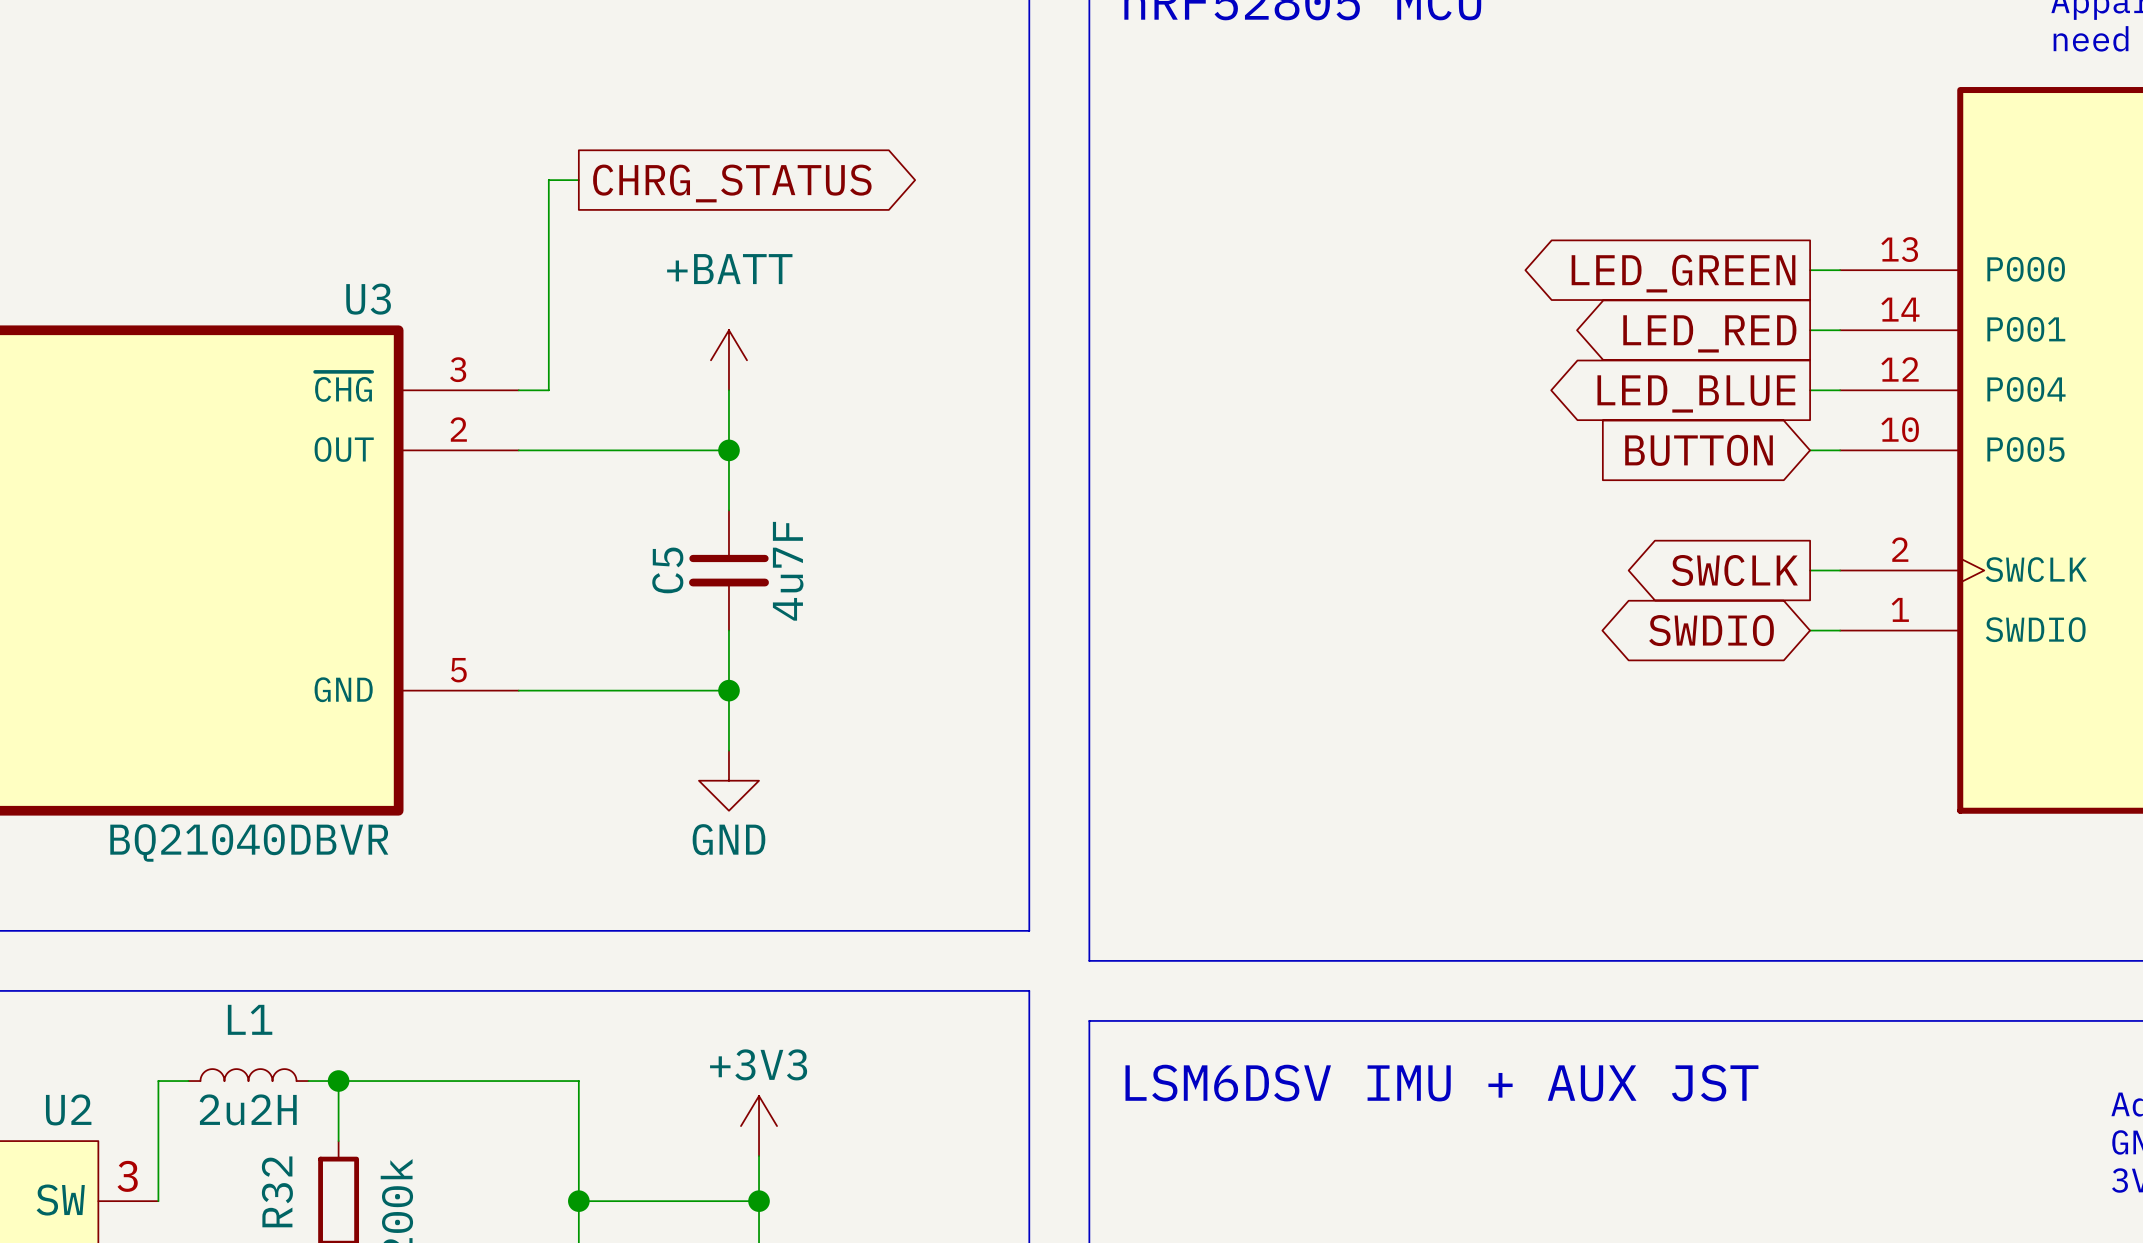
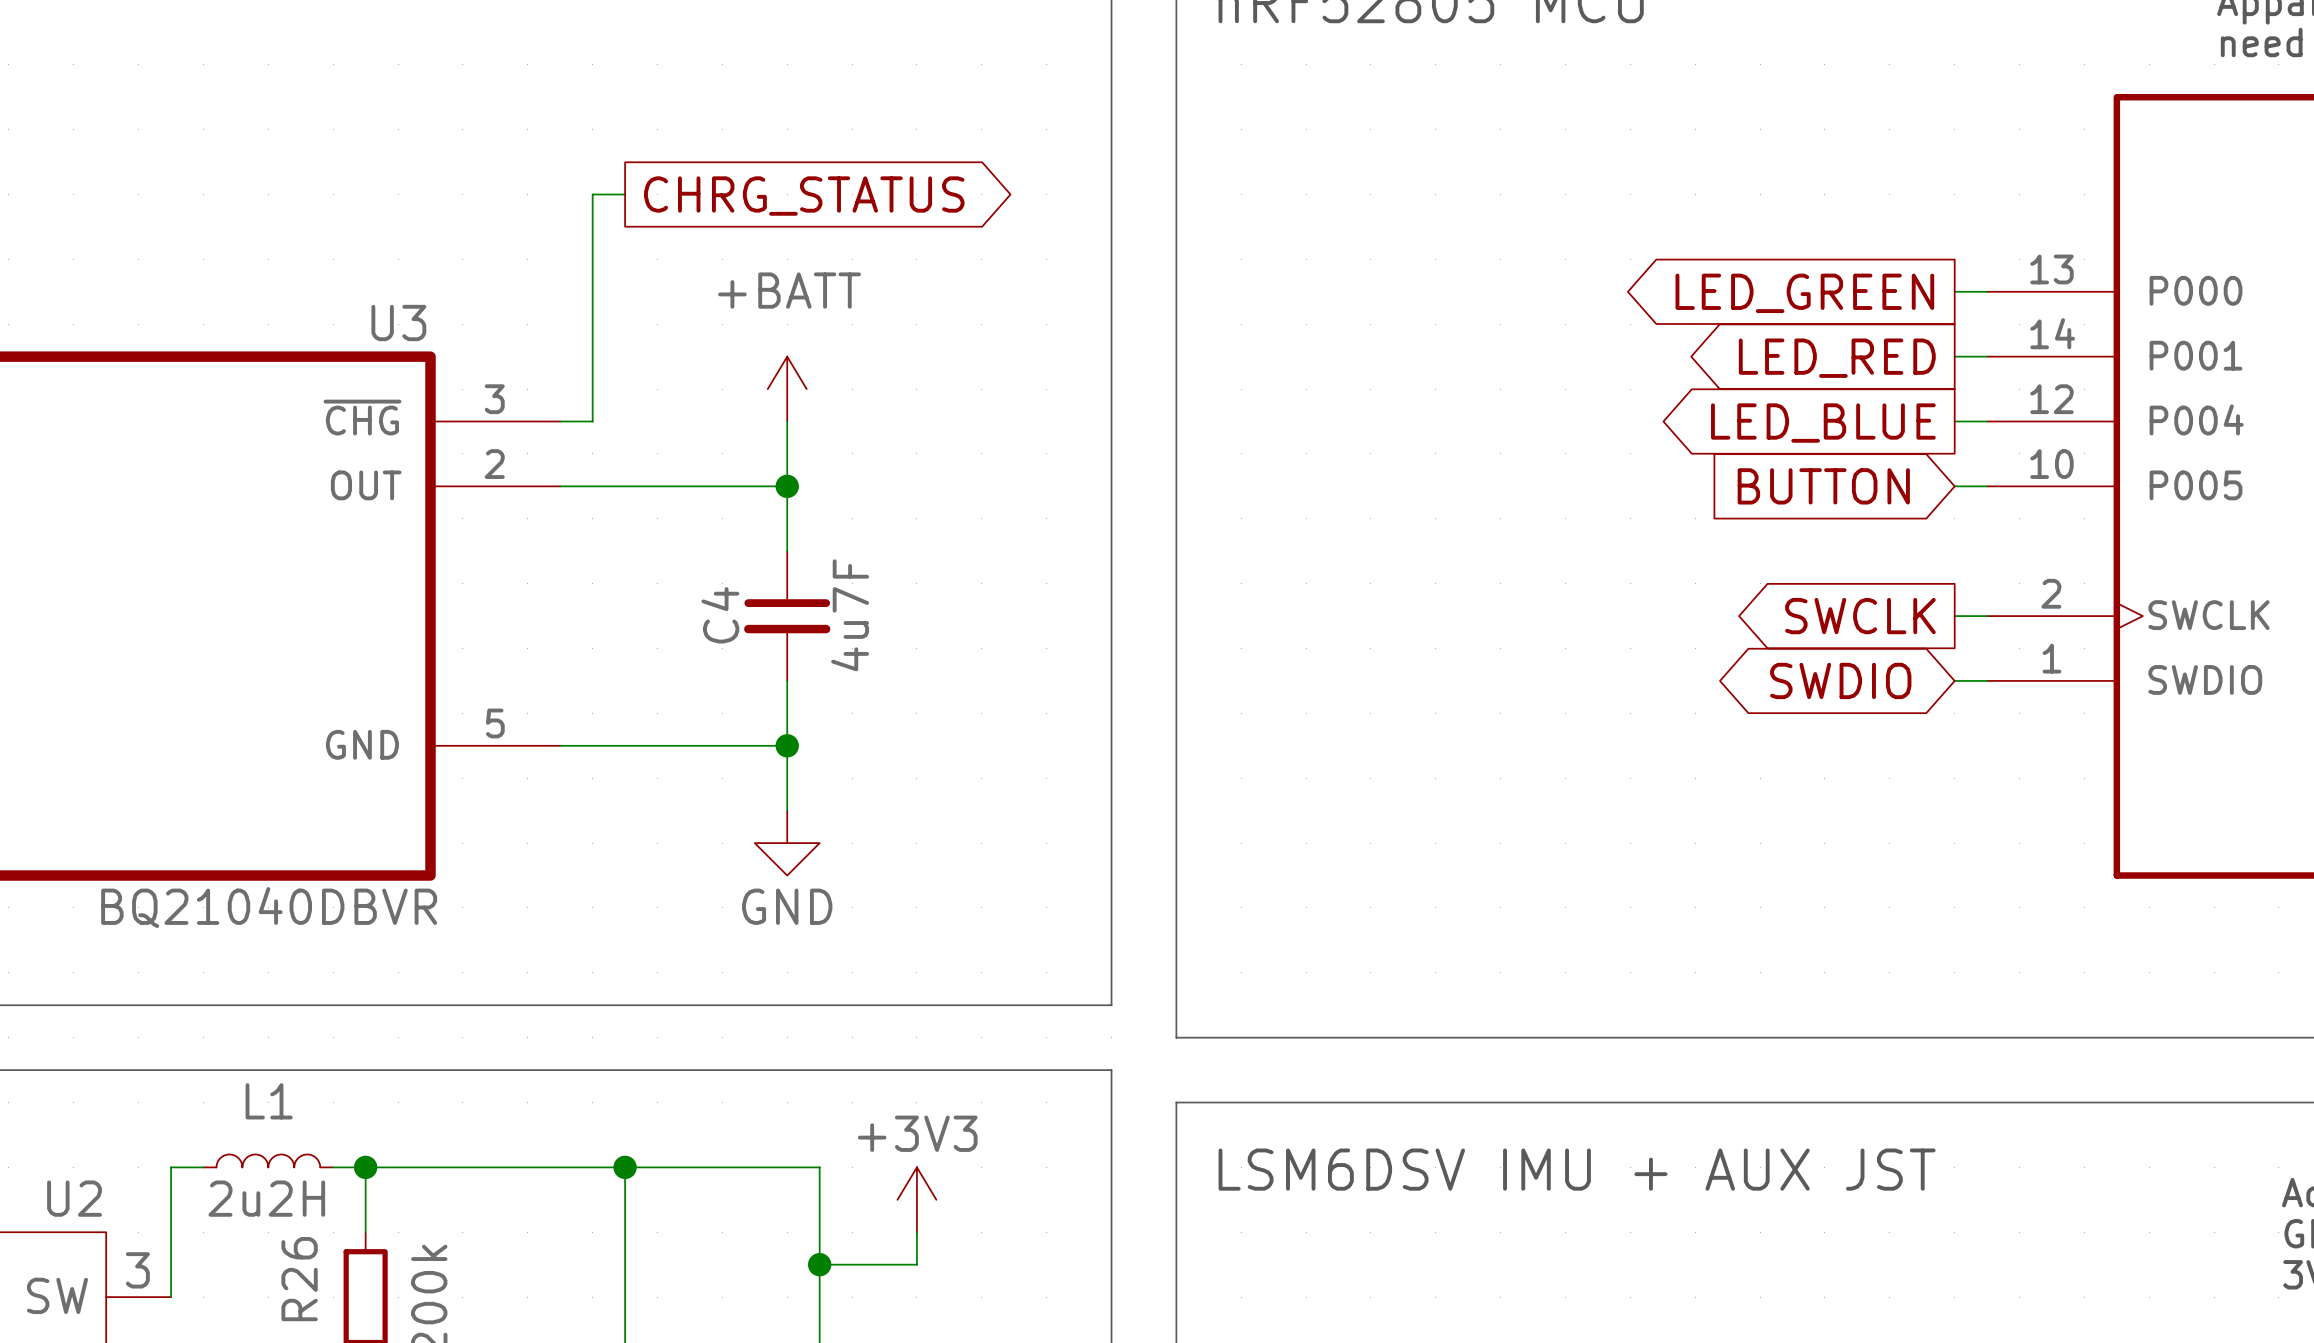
C5 name: C5 (667, 570) -> C4 (720, 615)
wire: none -> (625, 1167) (819, 1167) (819, 1248)
junction: none -> (625, 1167)
power symbol position: +3V3 (759, 1126) -> +3V3 (916, 1199)
wire: none -> (916, 1232) (916, 1264) (819, 1264)
R32 name: R32 (277, 1191) -> R26 (299, 1279)
wire: (578, 1201) (759, 1201) -> none
junction: (578, 1201) -> none
junction position: (759, 1201) -> (819, 1264)

